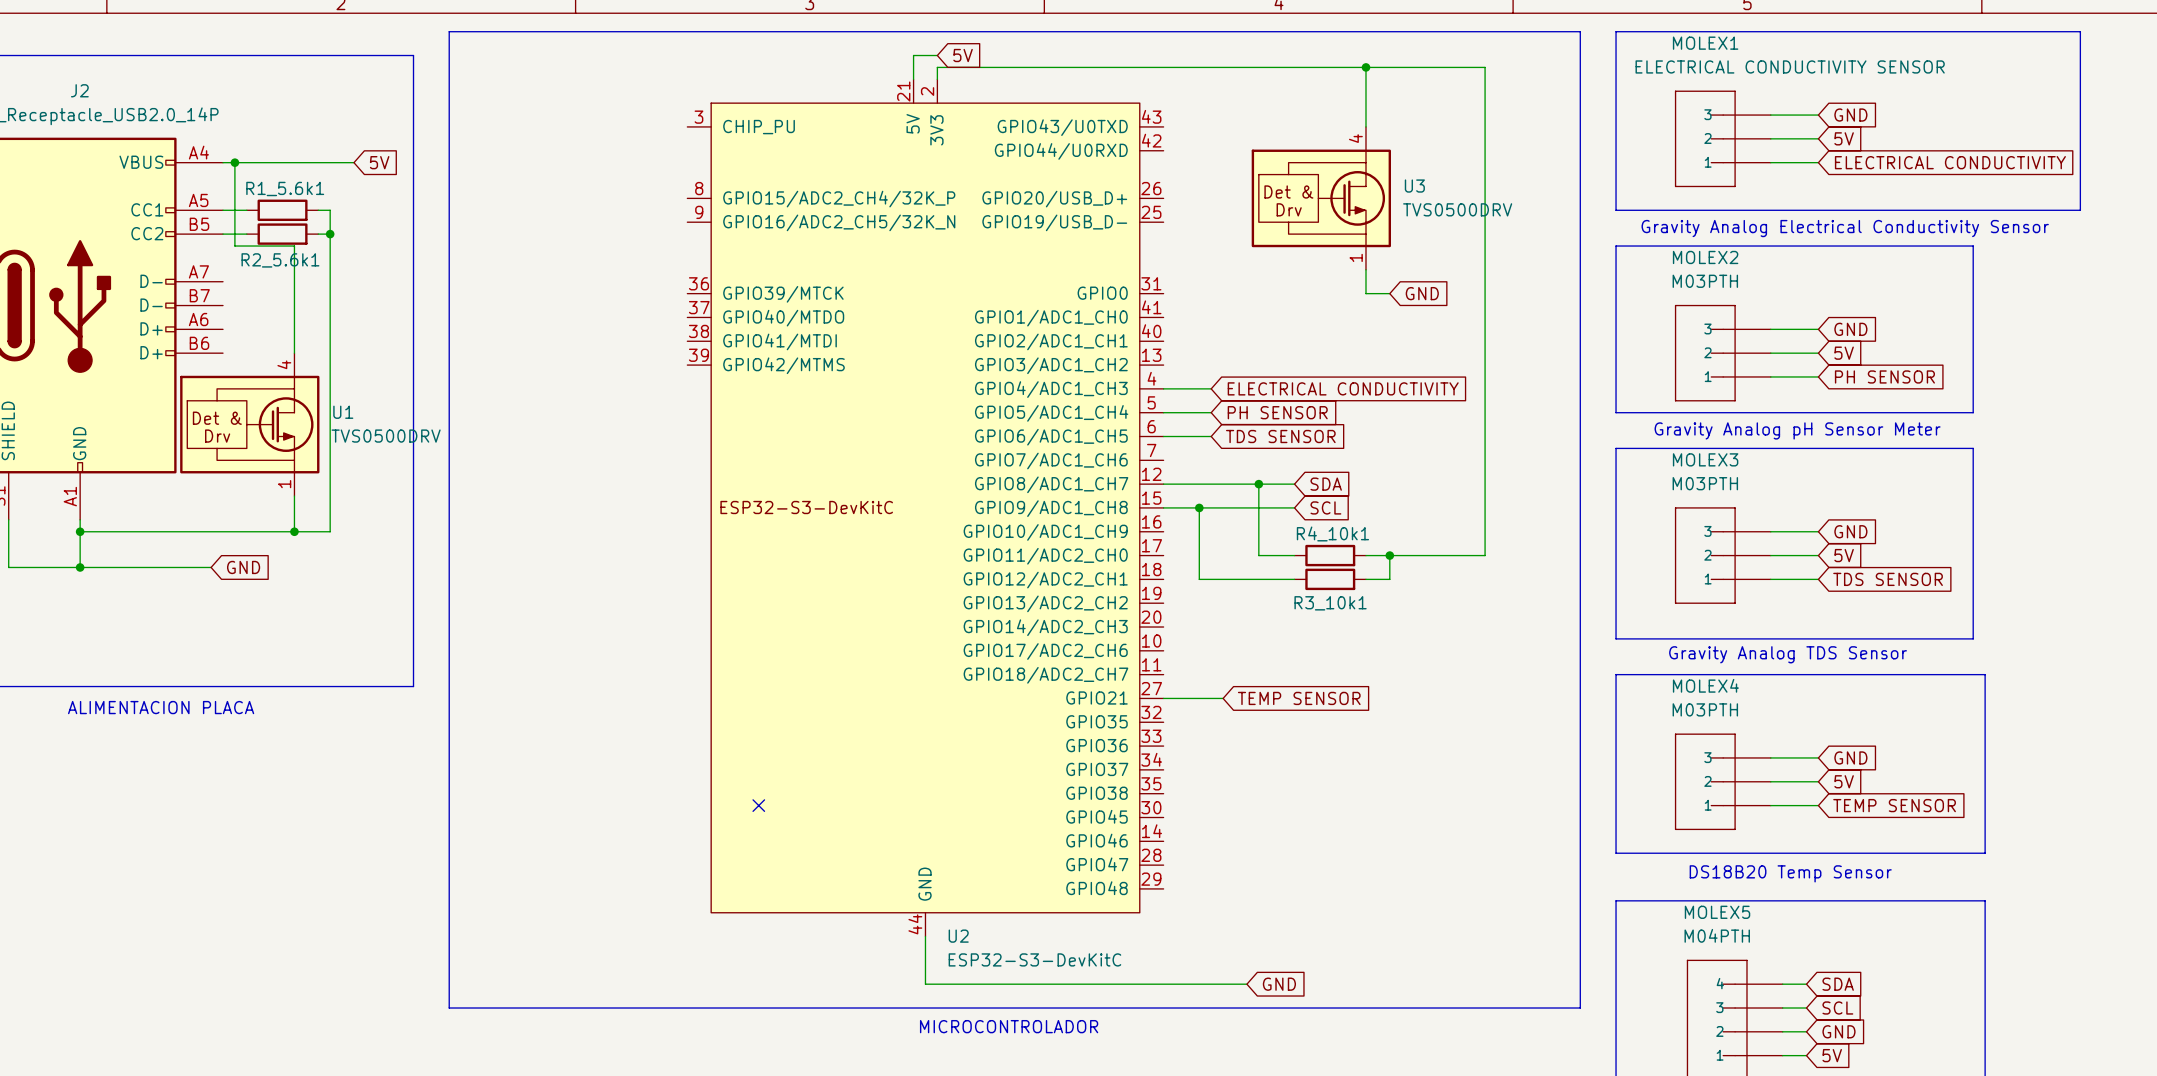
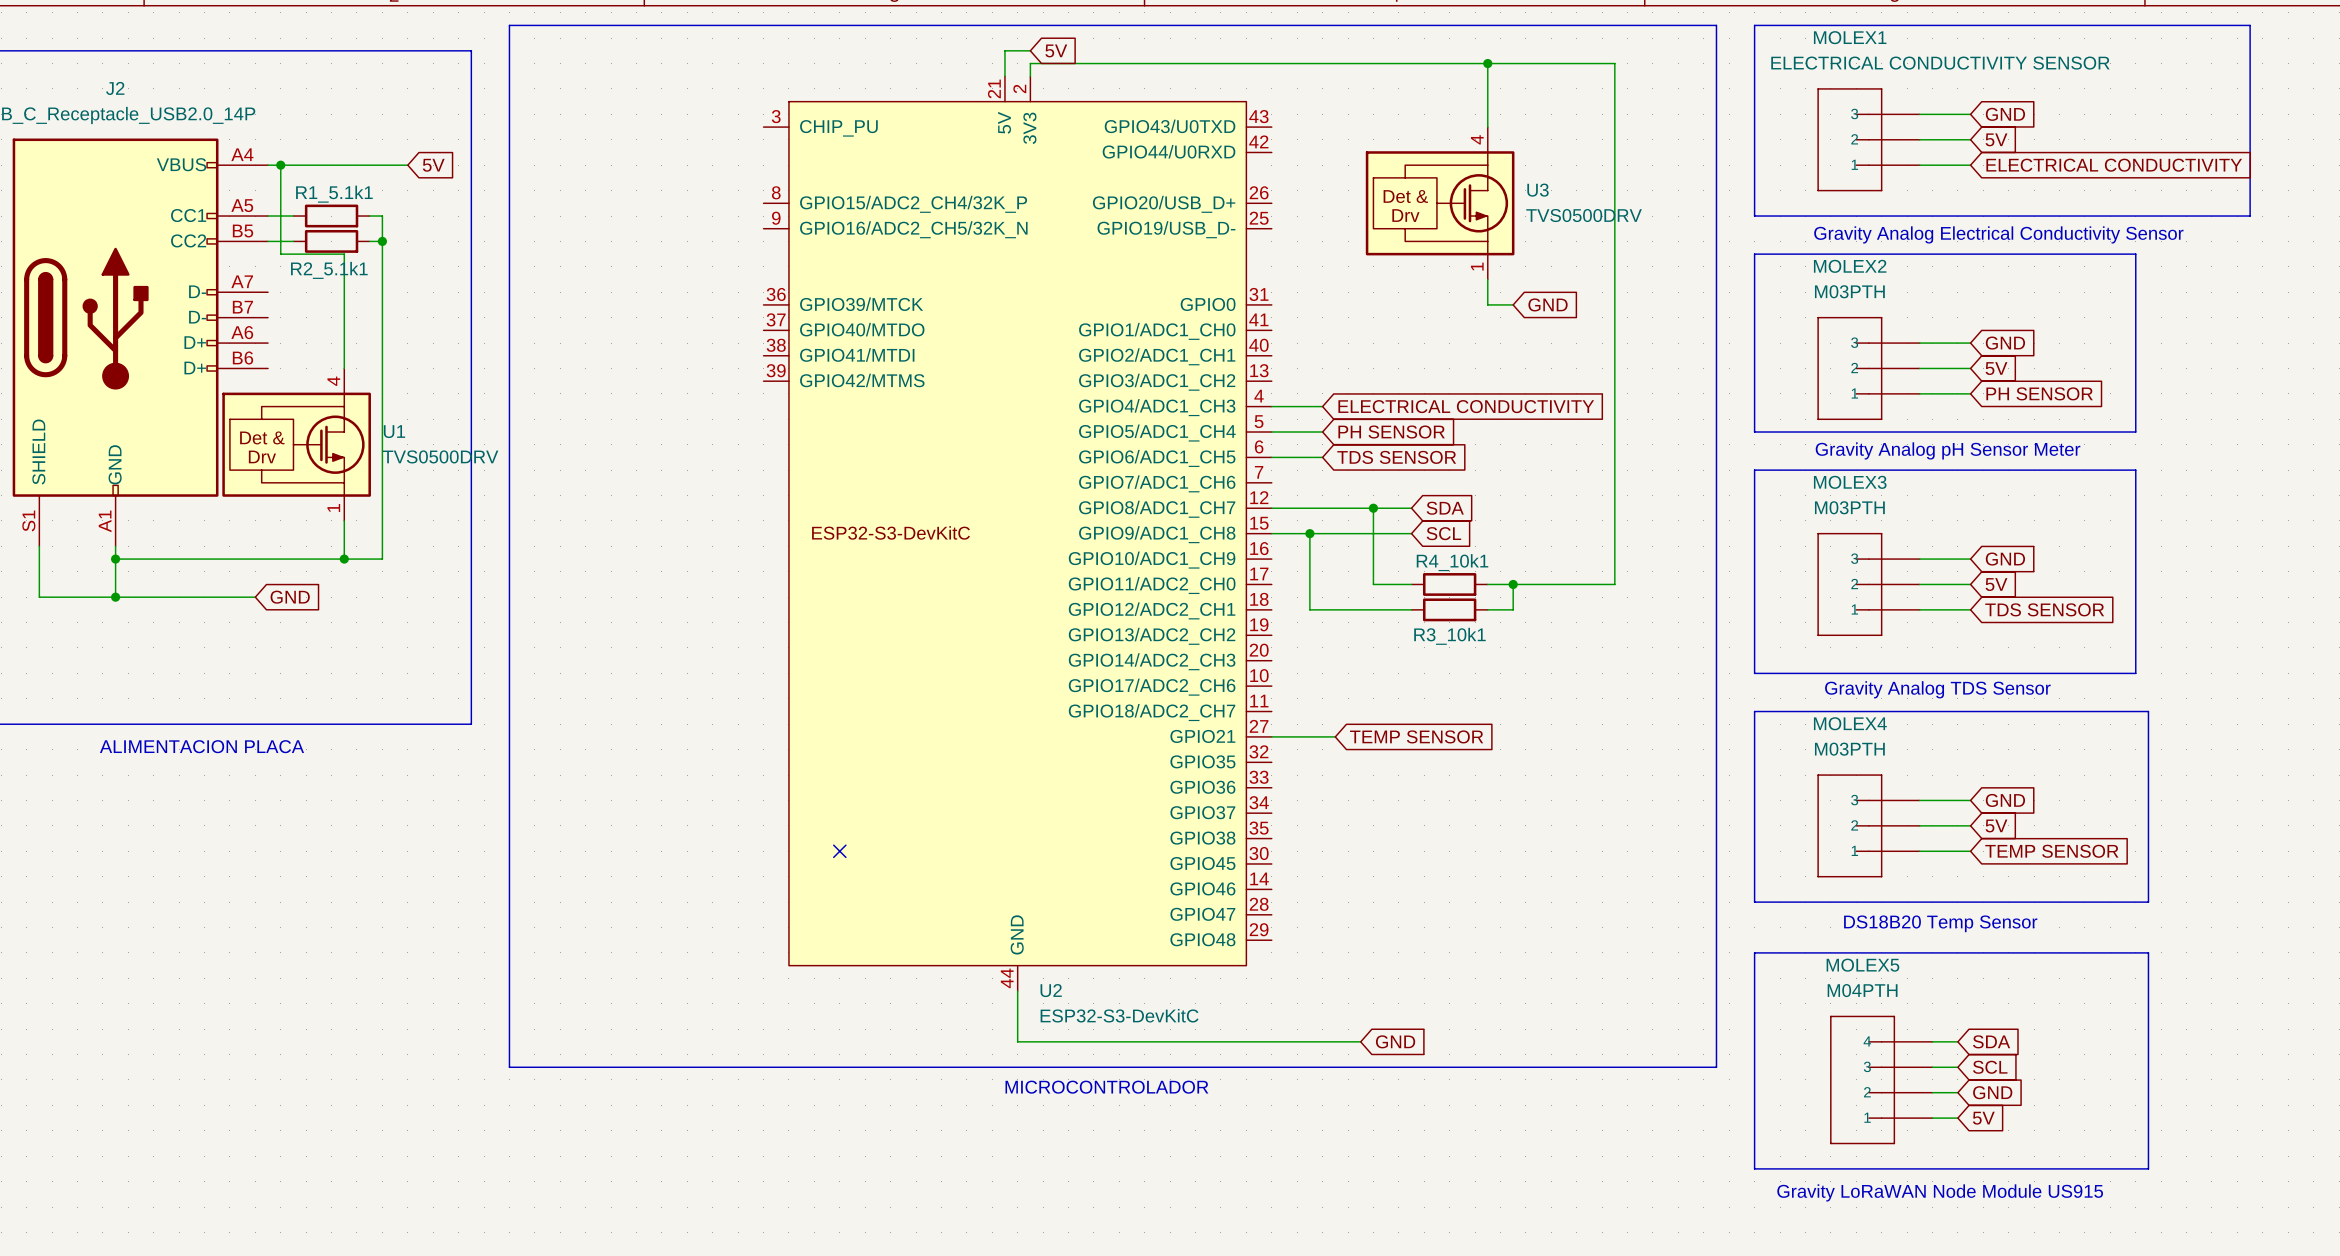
R1_5.6k1 name: R1_5.6k1 (285, 188) -> R1_5.1k1 (334, 194)
R2_5.6k1 name: R2_5.6k1 (280, 260) -> R2_5.1k1 (329, 270)

